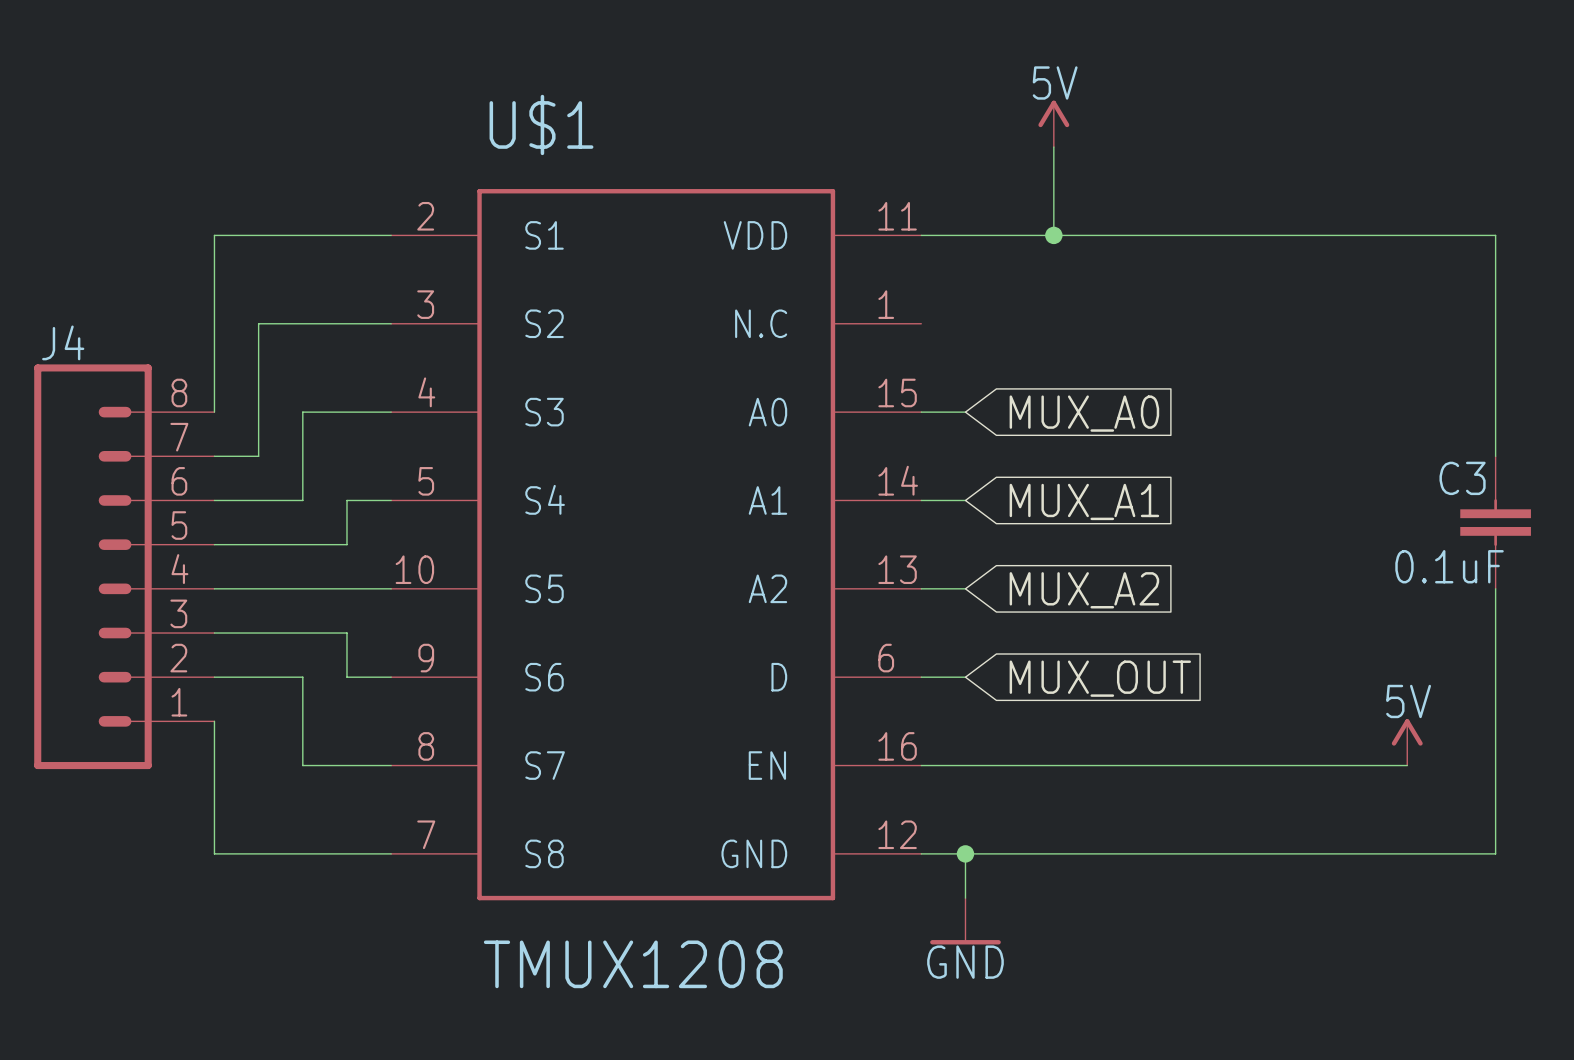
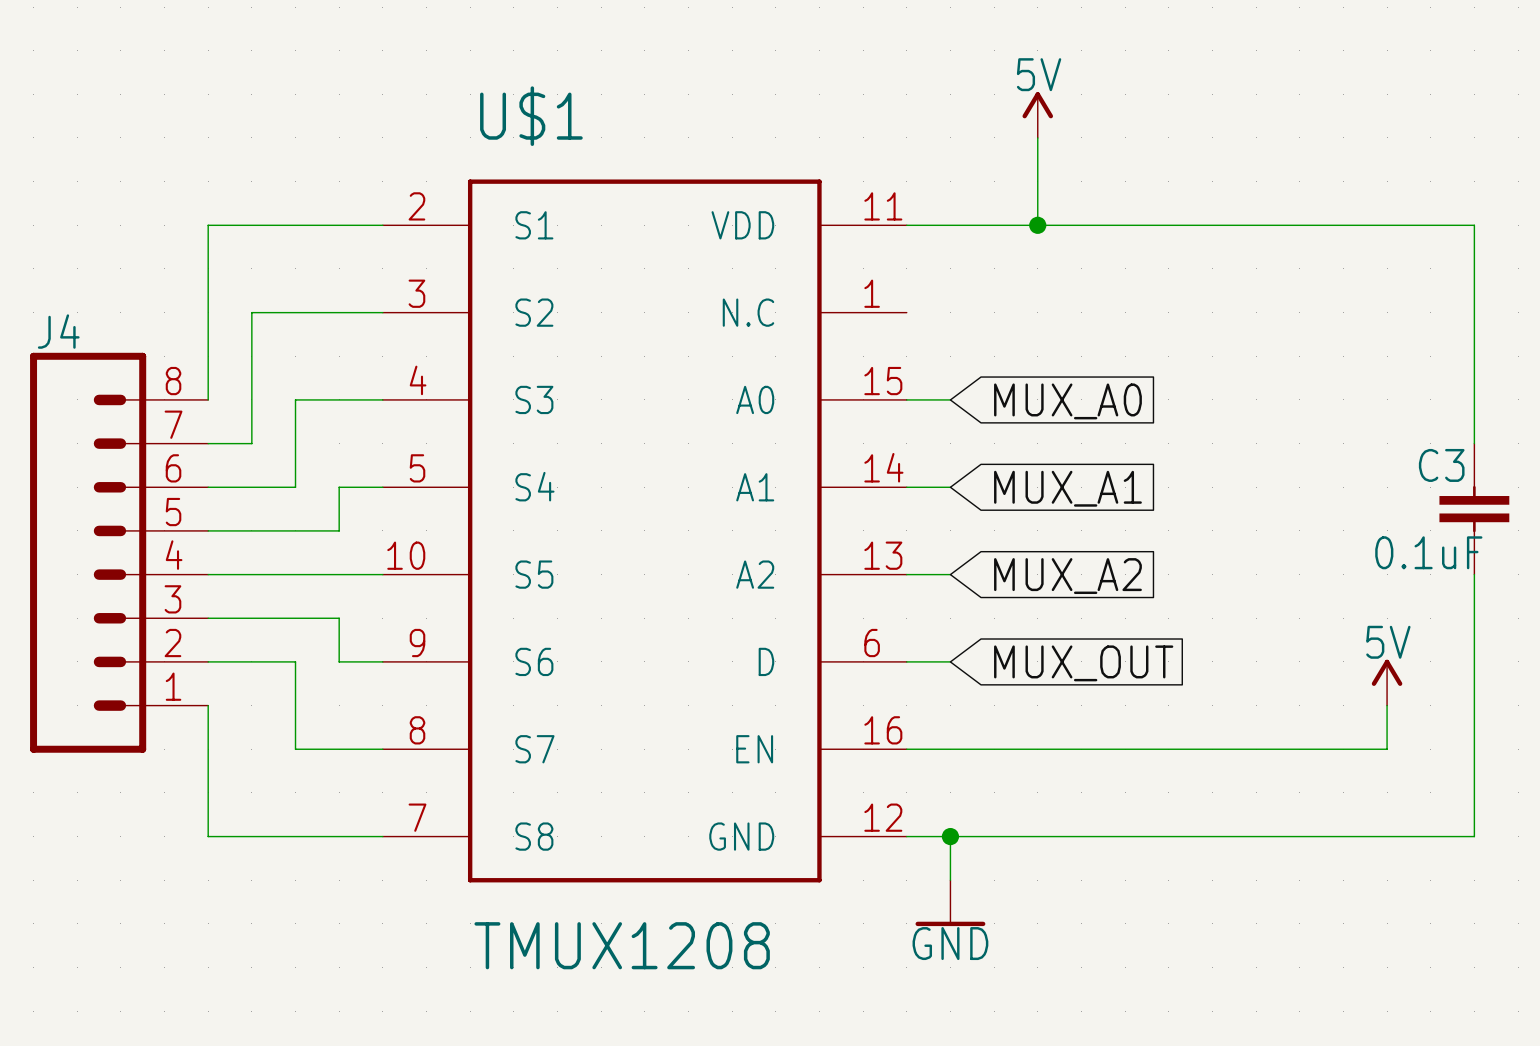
power symbol position: 5V (1407, 742) -> 5V (1387, 682)

